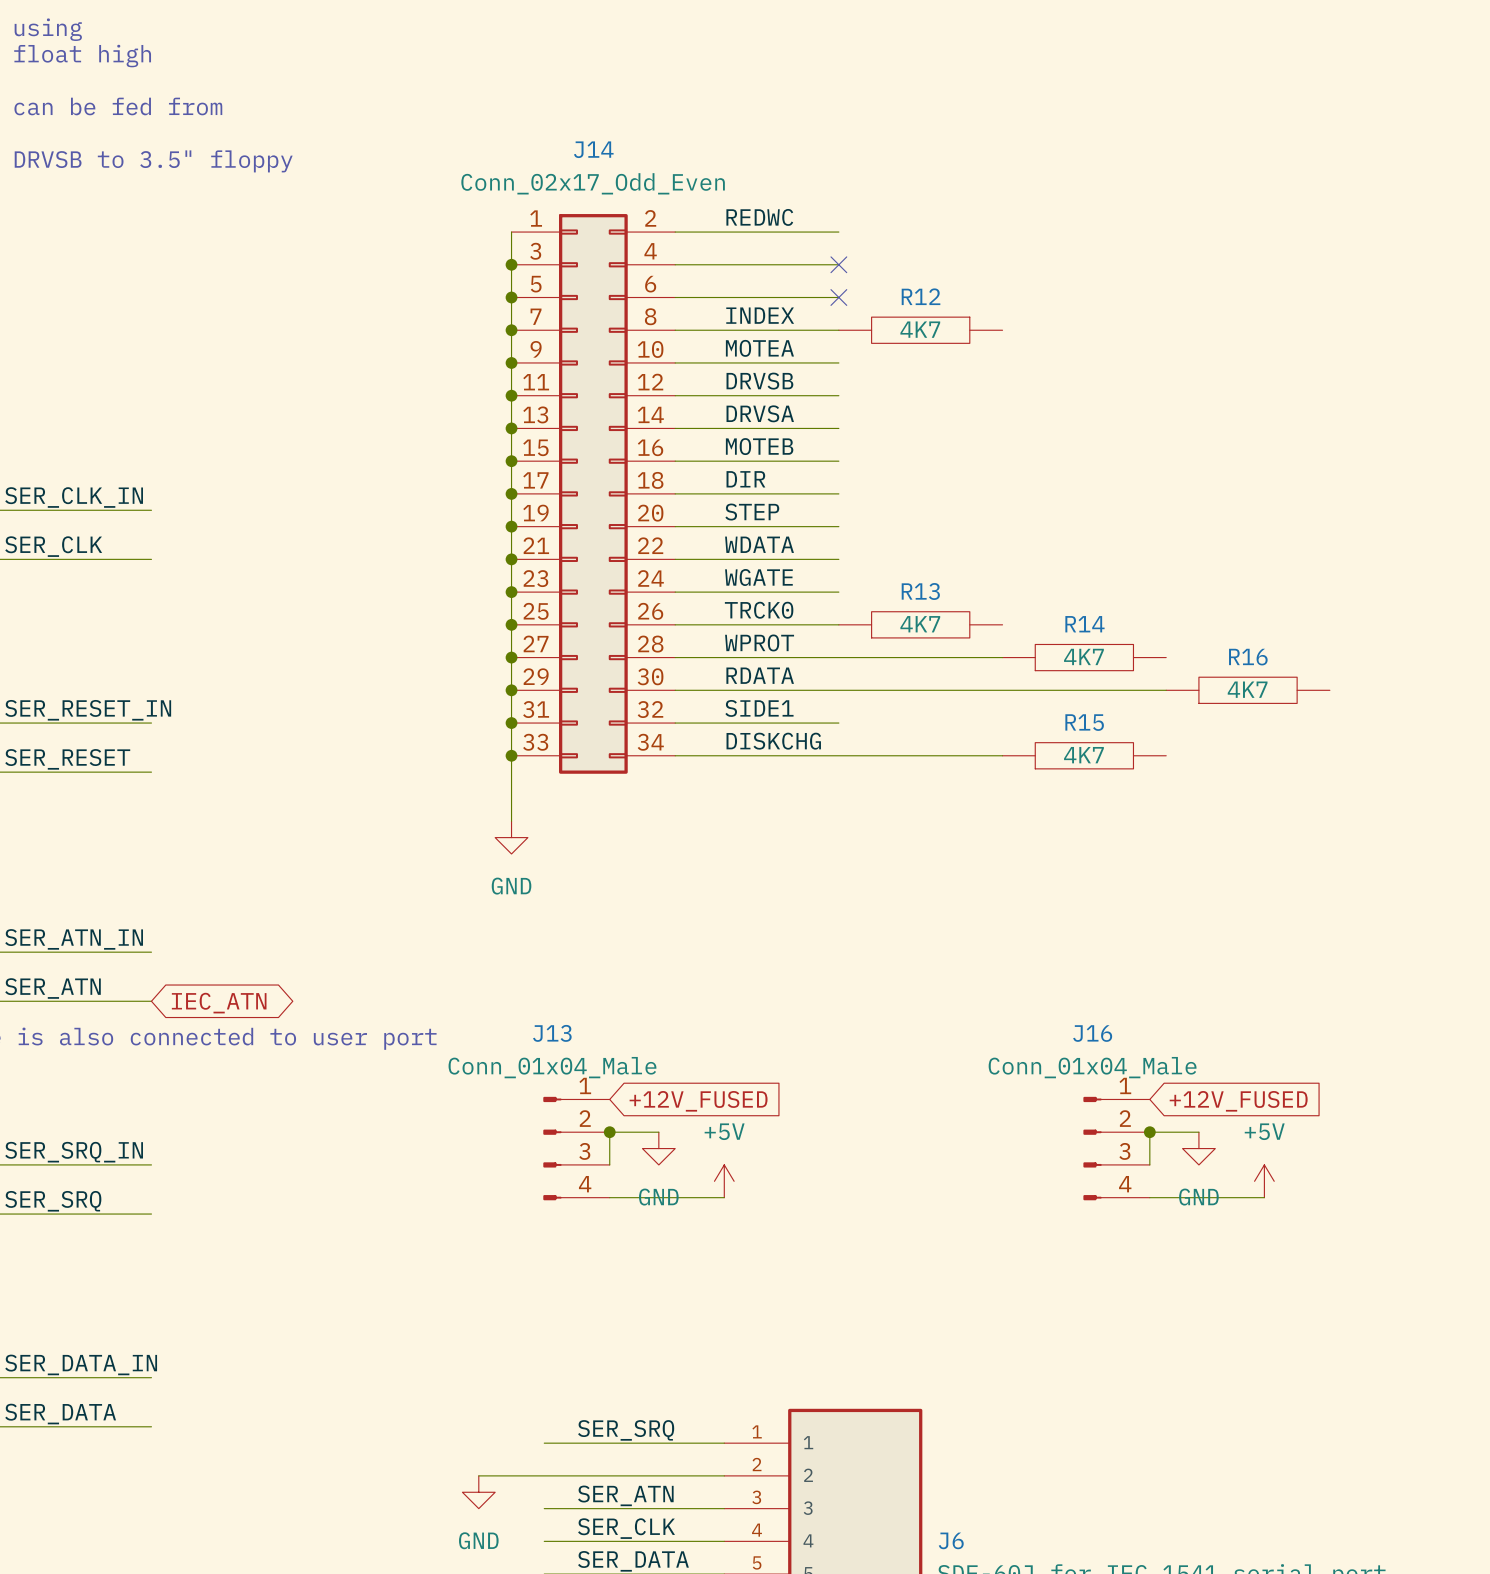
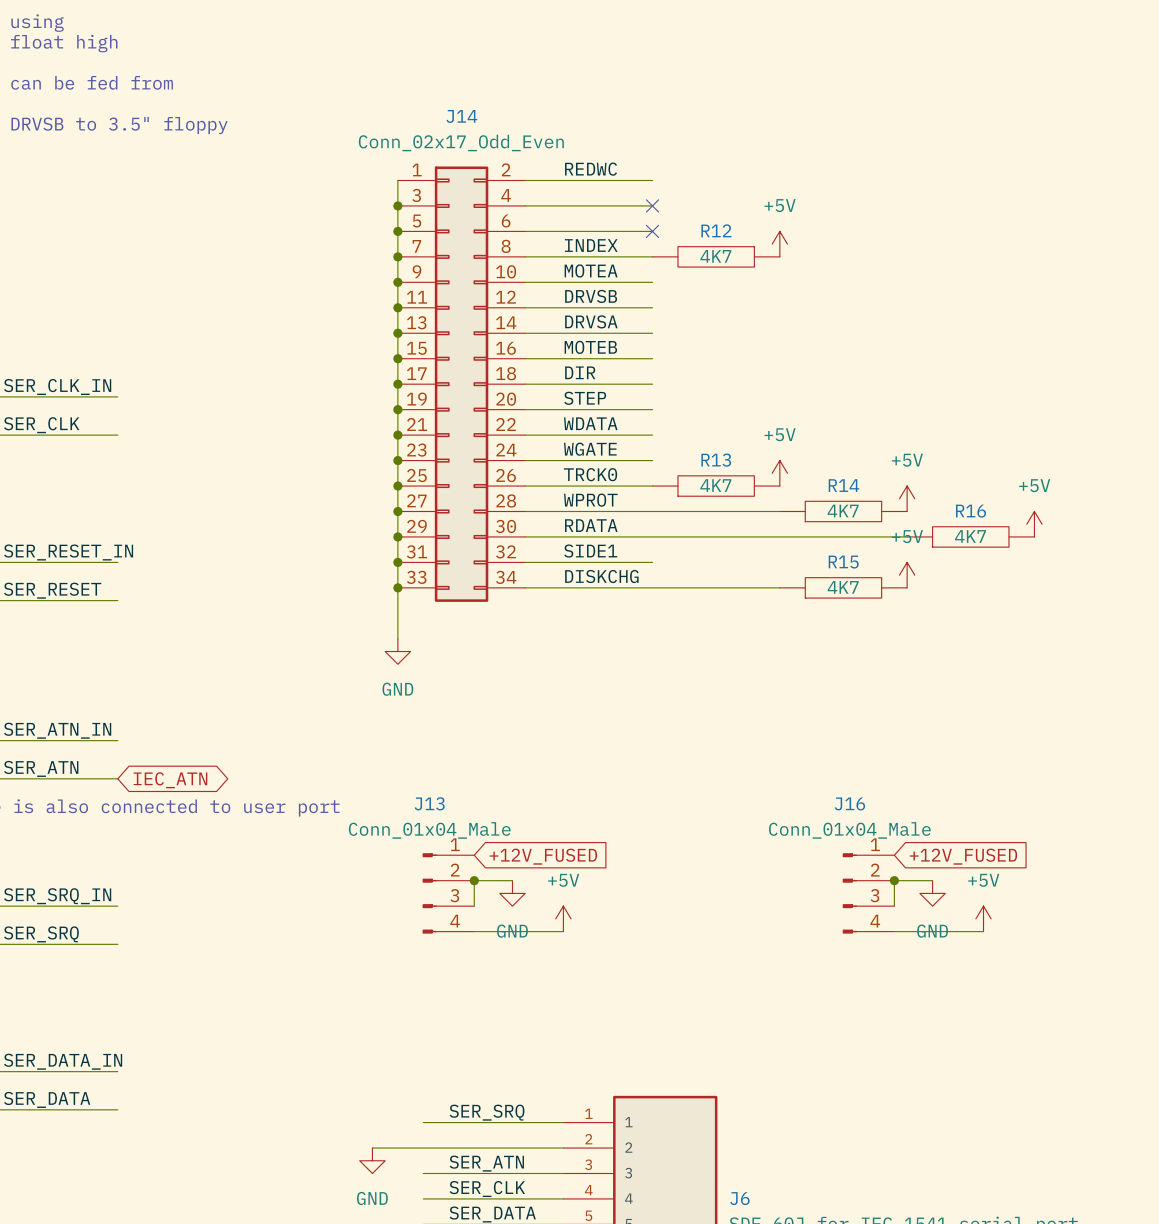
power symbol: none -> +5V (779, 244)
power symbol: none -> +5V (779, 473)
power symbol: none -> +5V (907, 498)
power symbol: none -> +5V (1034, 524)
power symbol: none -> +5V (907, 575)

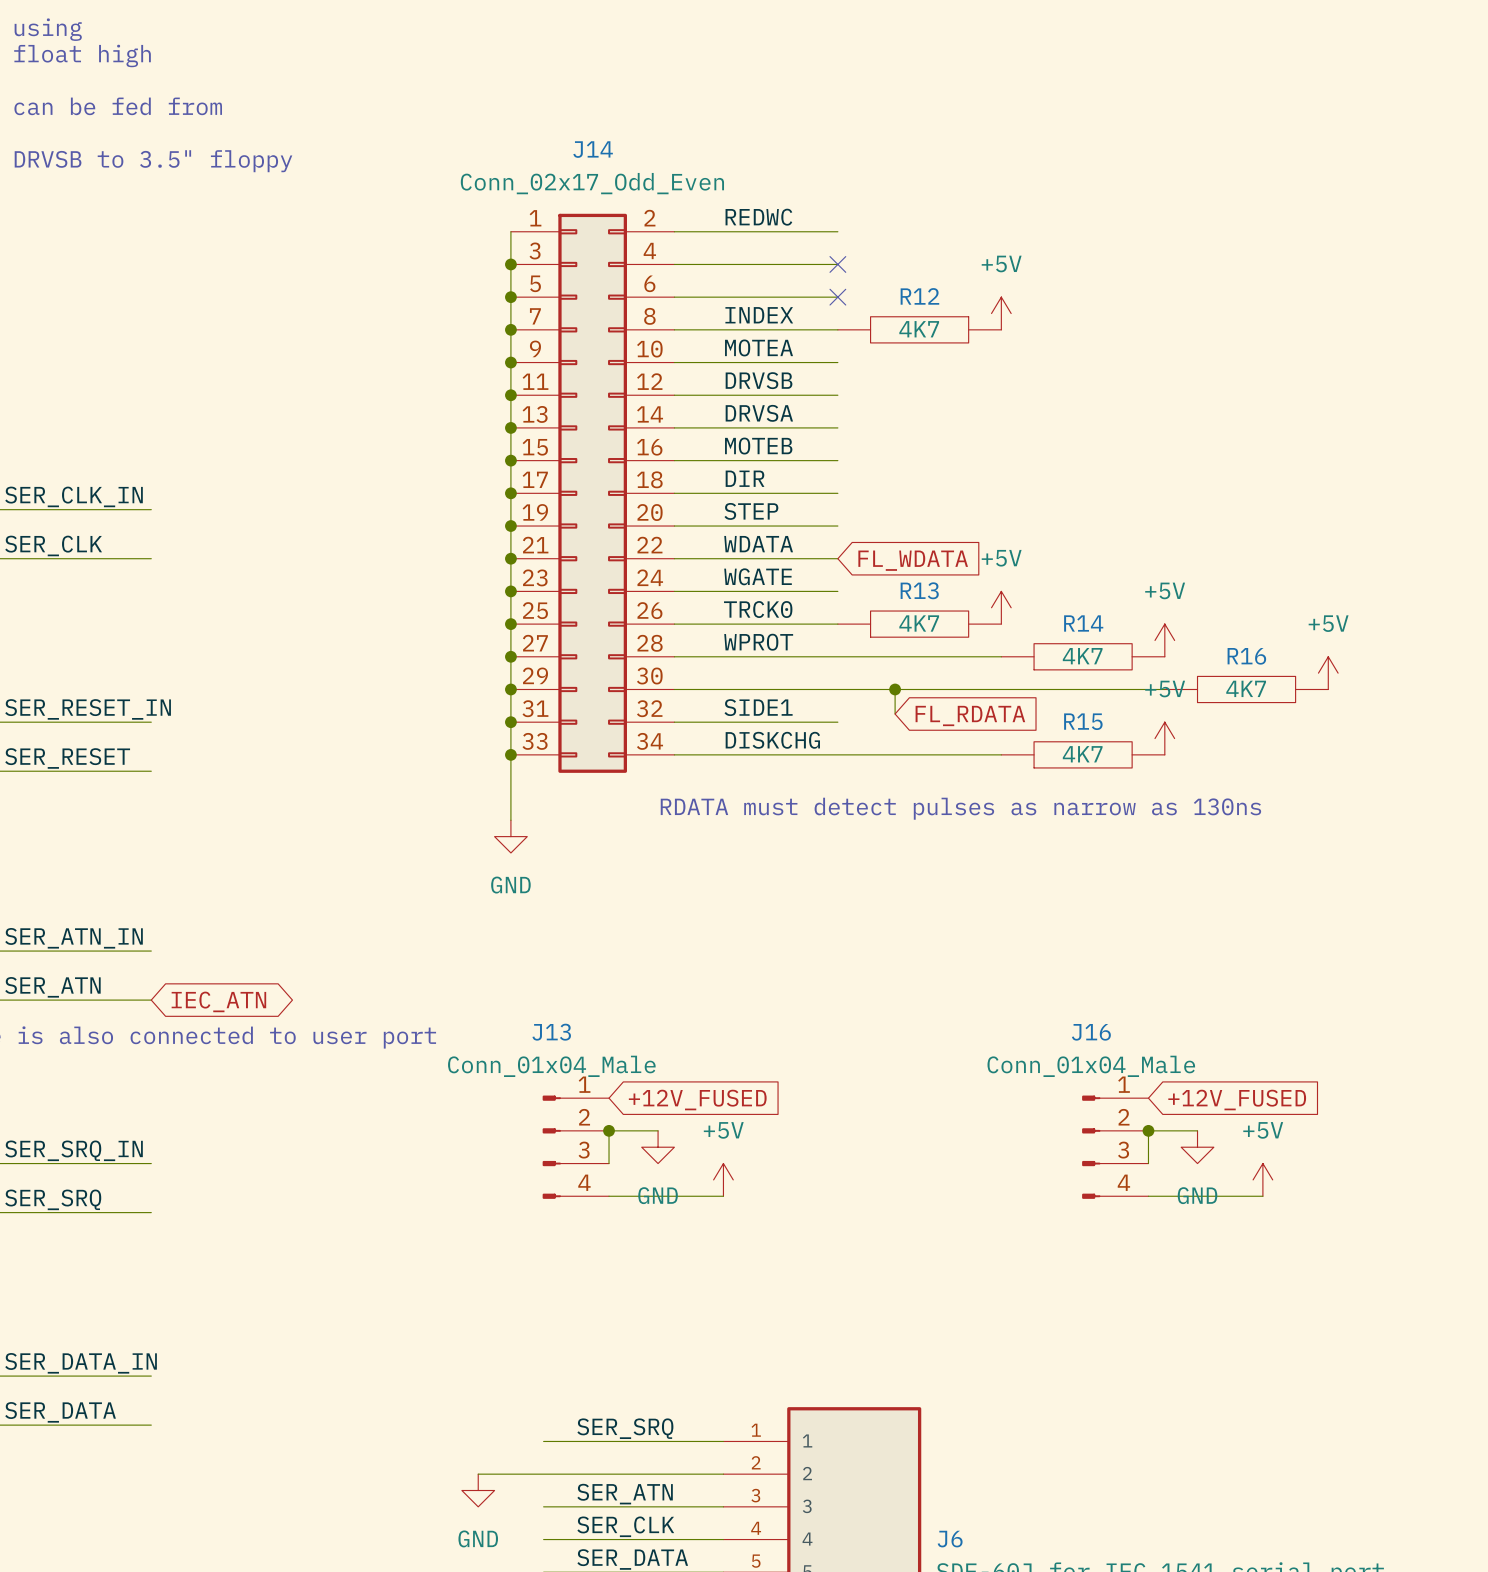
global label: none -> FL_WDATA (913, 560)
label: RDATA (591, 525) -> none
wire: none -> (895, 689) (895, 714)
junction: none -> (895, 689)
global label: none -> FL_RDATA (970, 715)
text: none -> RDATA must detect pulses as narrow as 130ns (960, 808)

